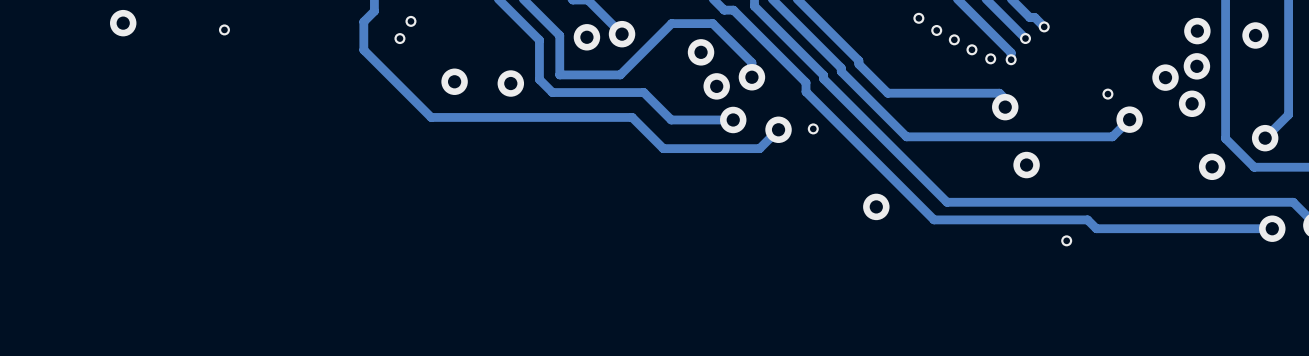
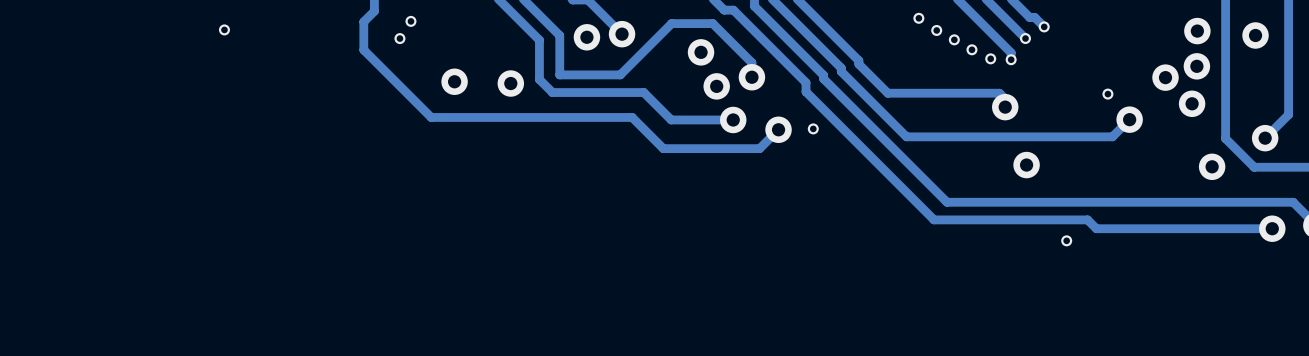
via: (123, 23) -> none
via: (876, 206) -> none

